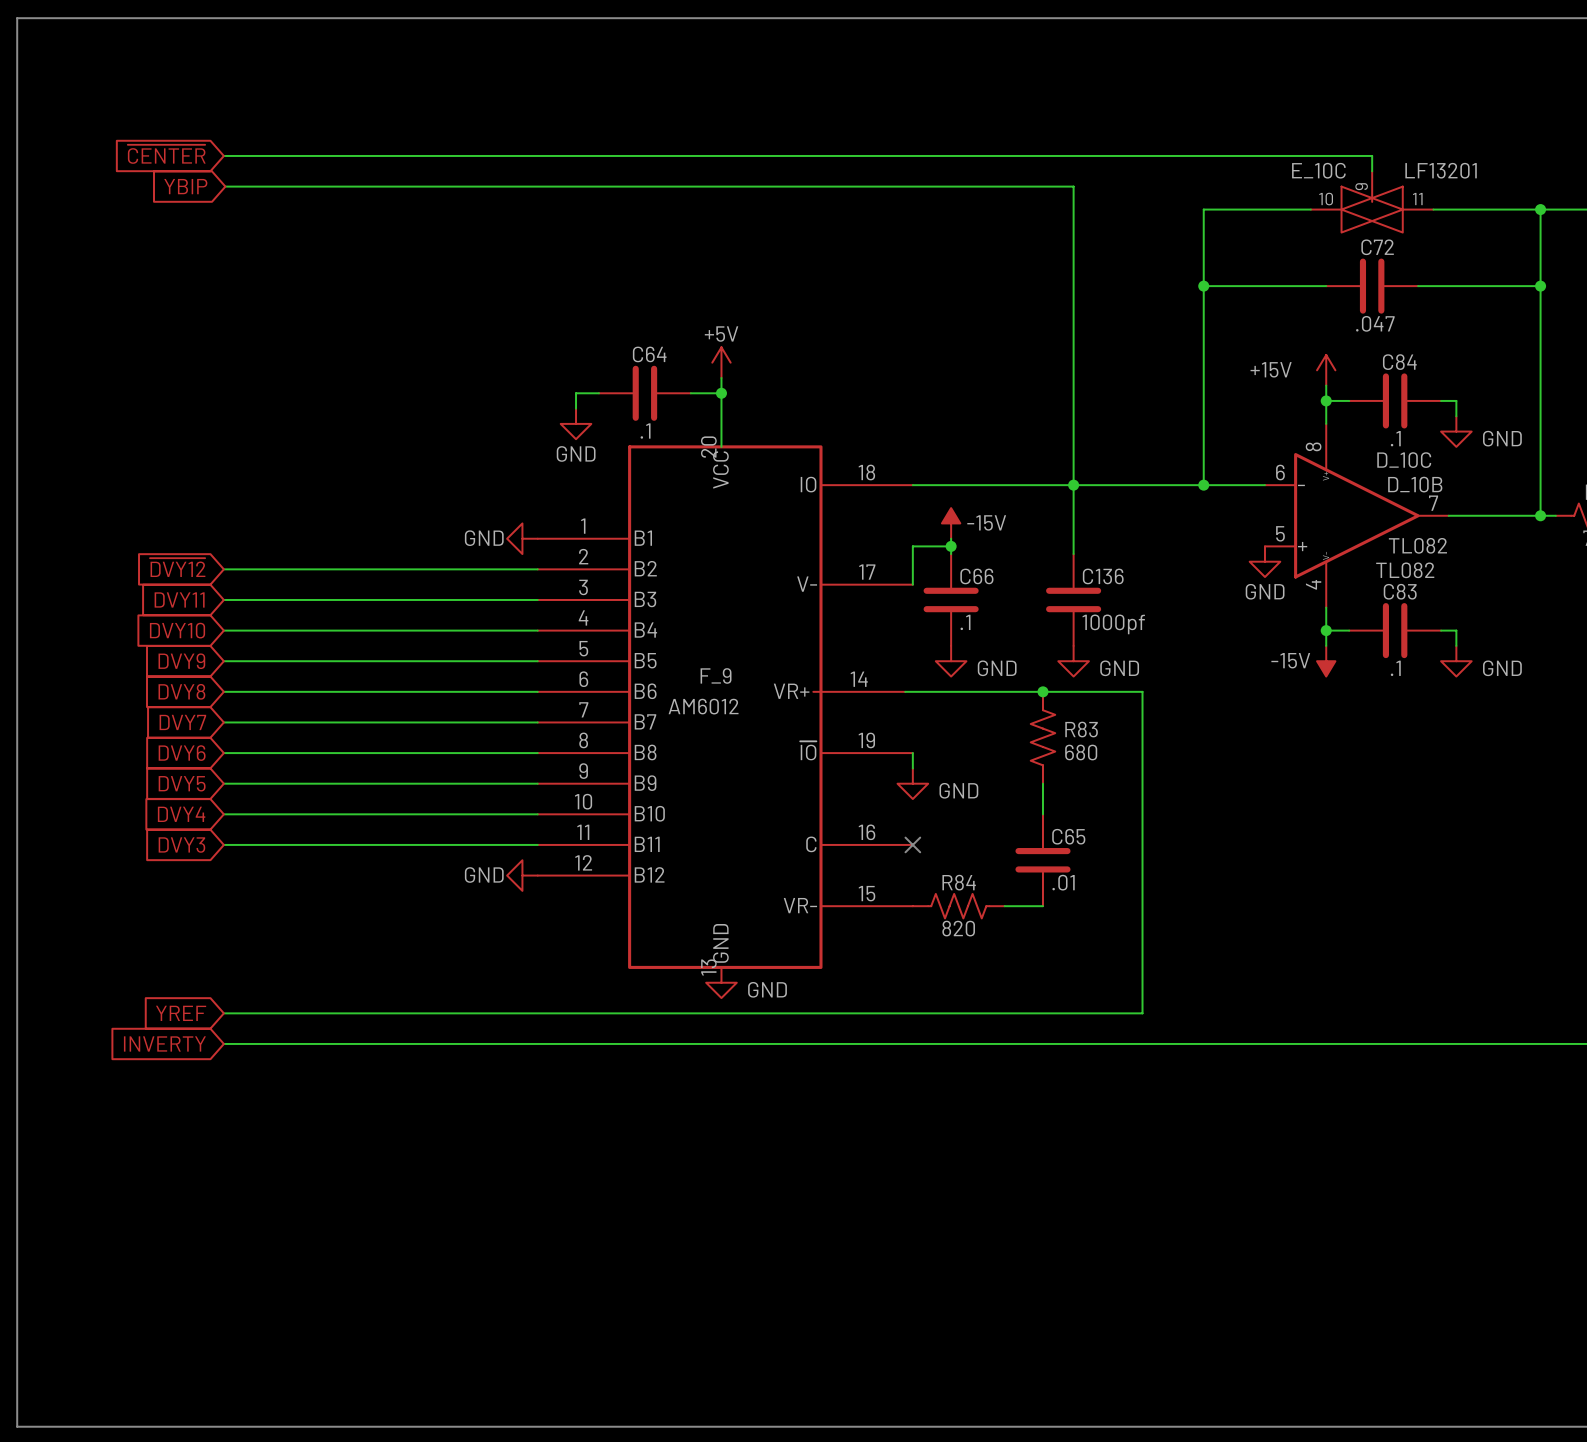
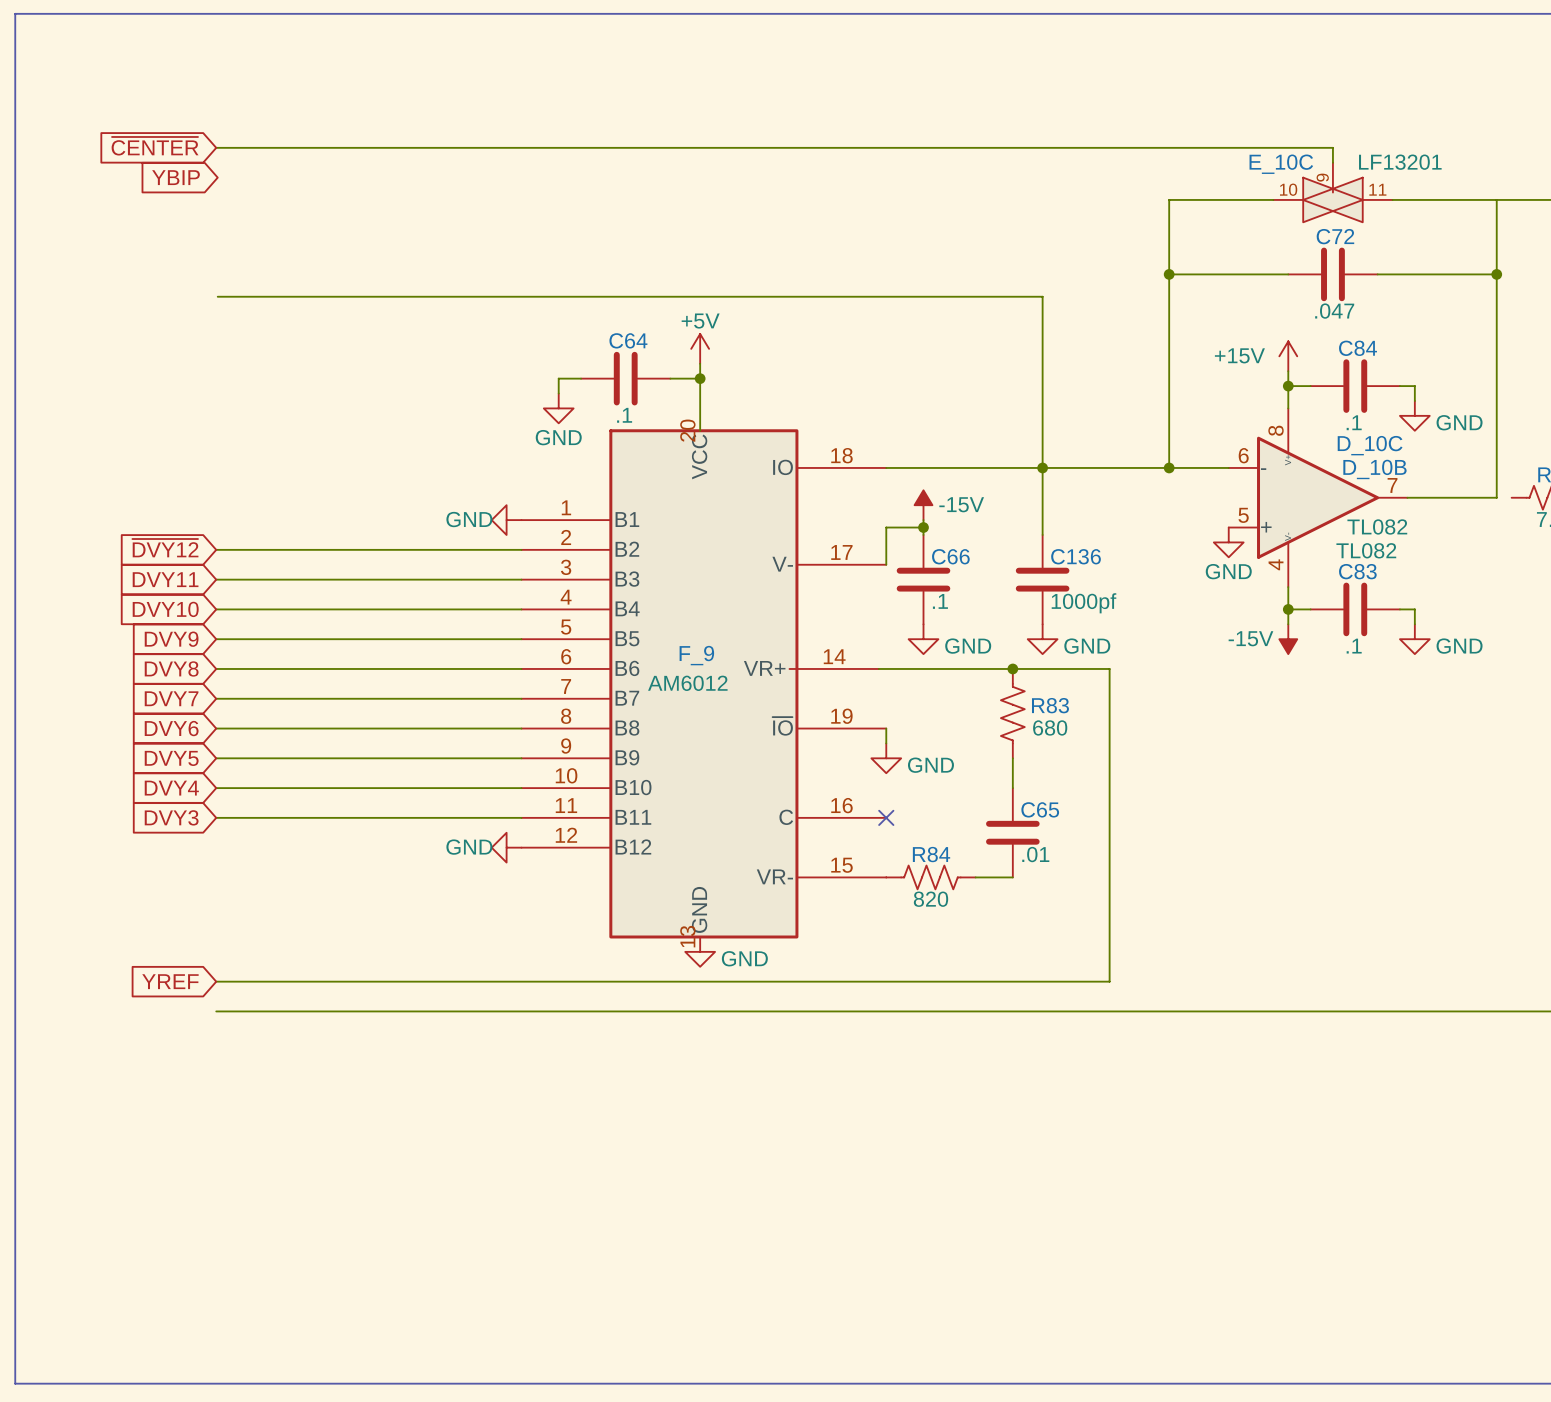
wire: (225, 186) (1073, 186) (1073, 309) -> (217, 296) (1042, 296)
junction: (1540, 209) -> none
wire: (1540, 515) (1555, 515) -> none
junction: (1540, 515) -> none
global label: INVERTY (164, 1043) -> none

